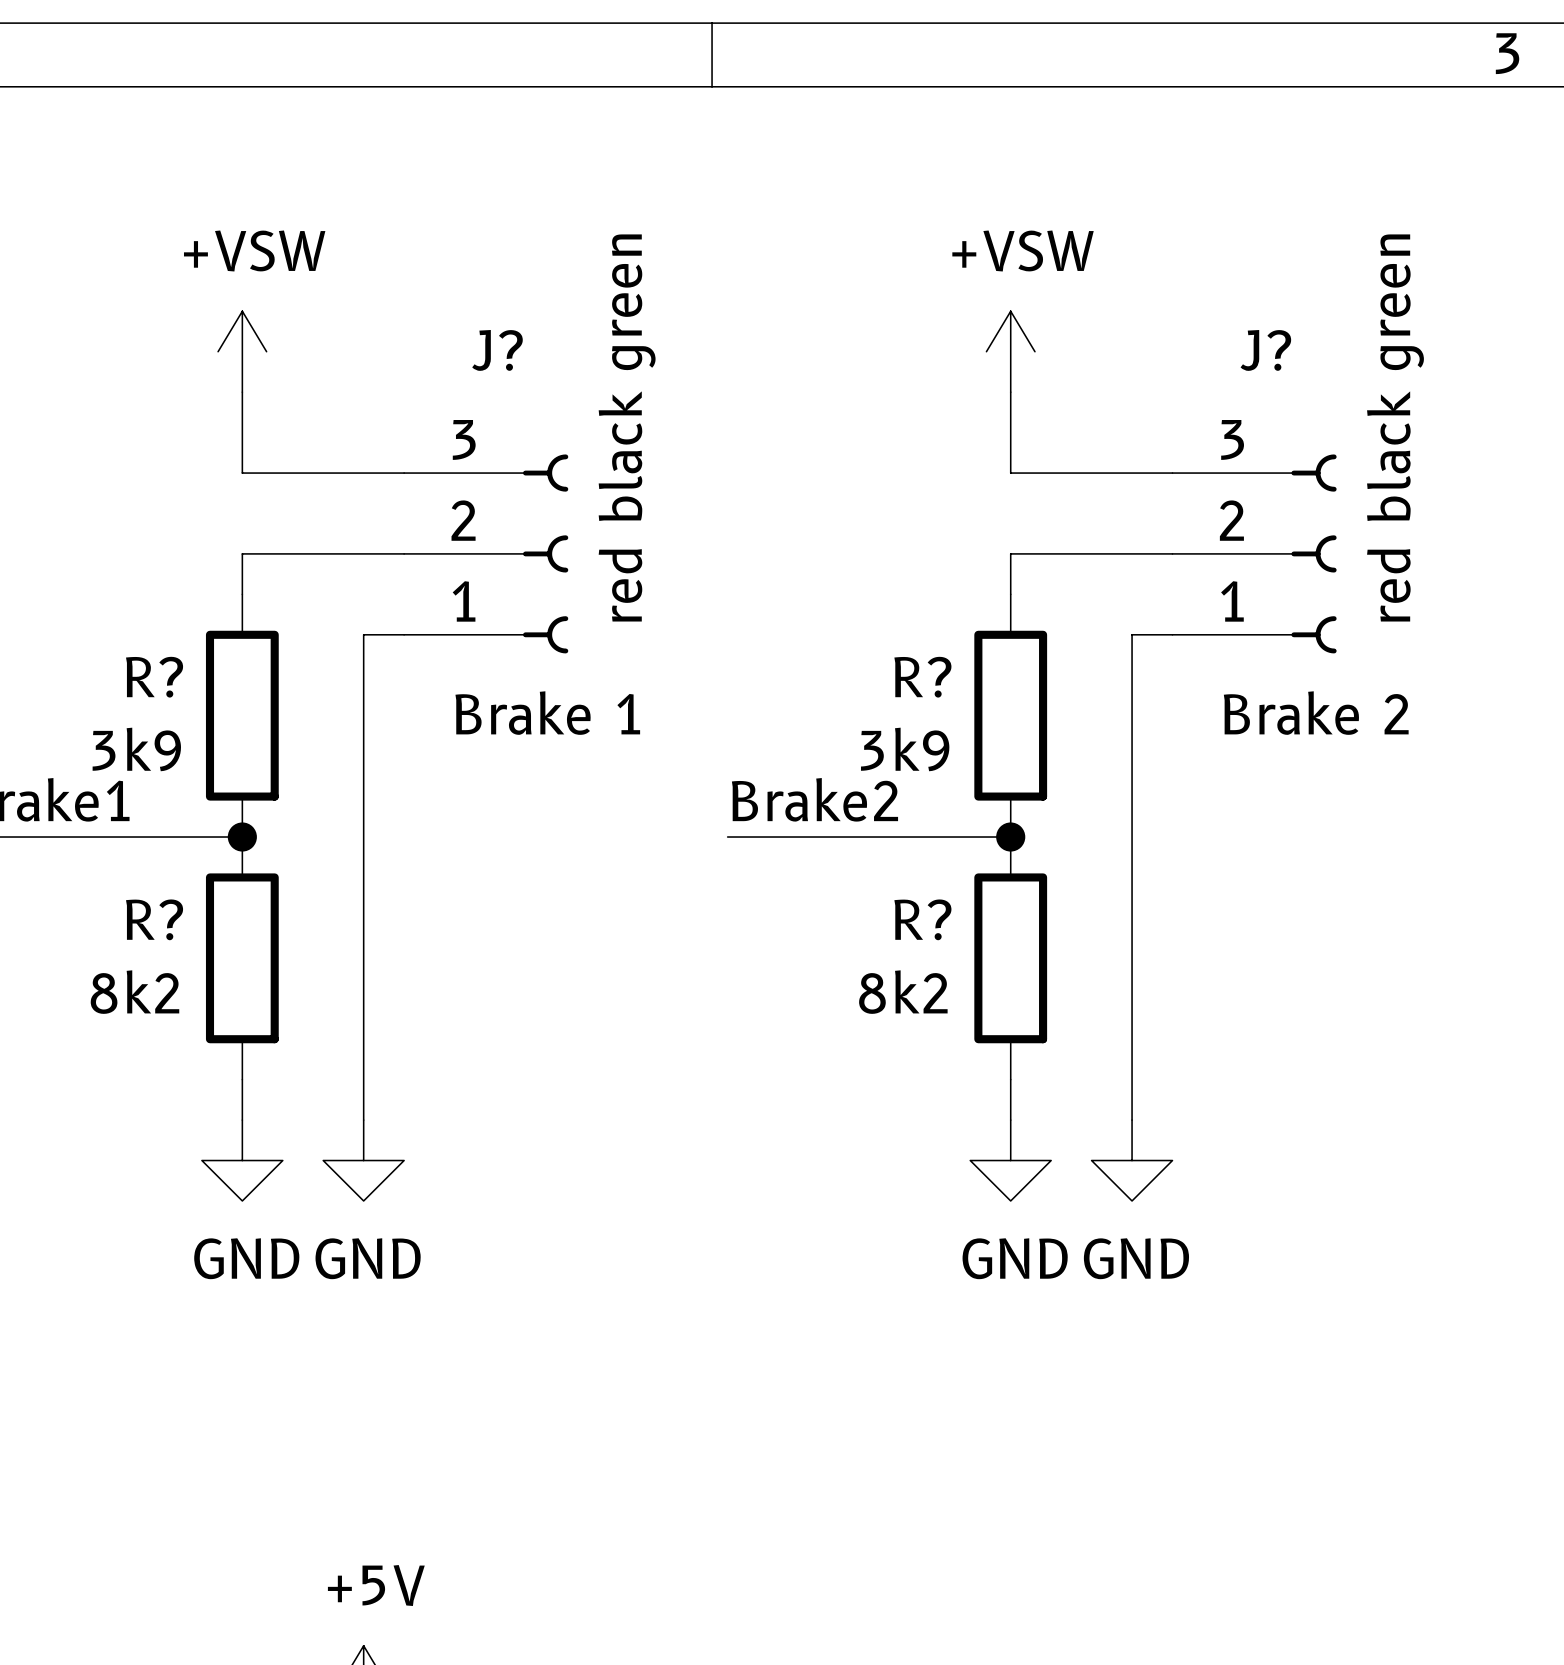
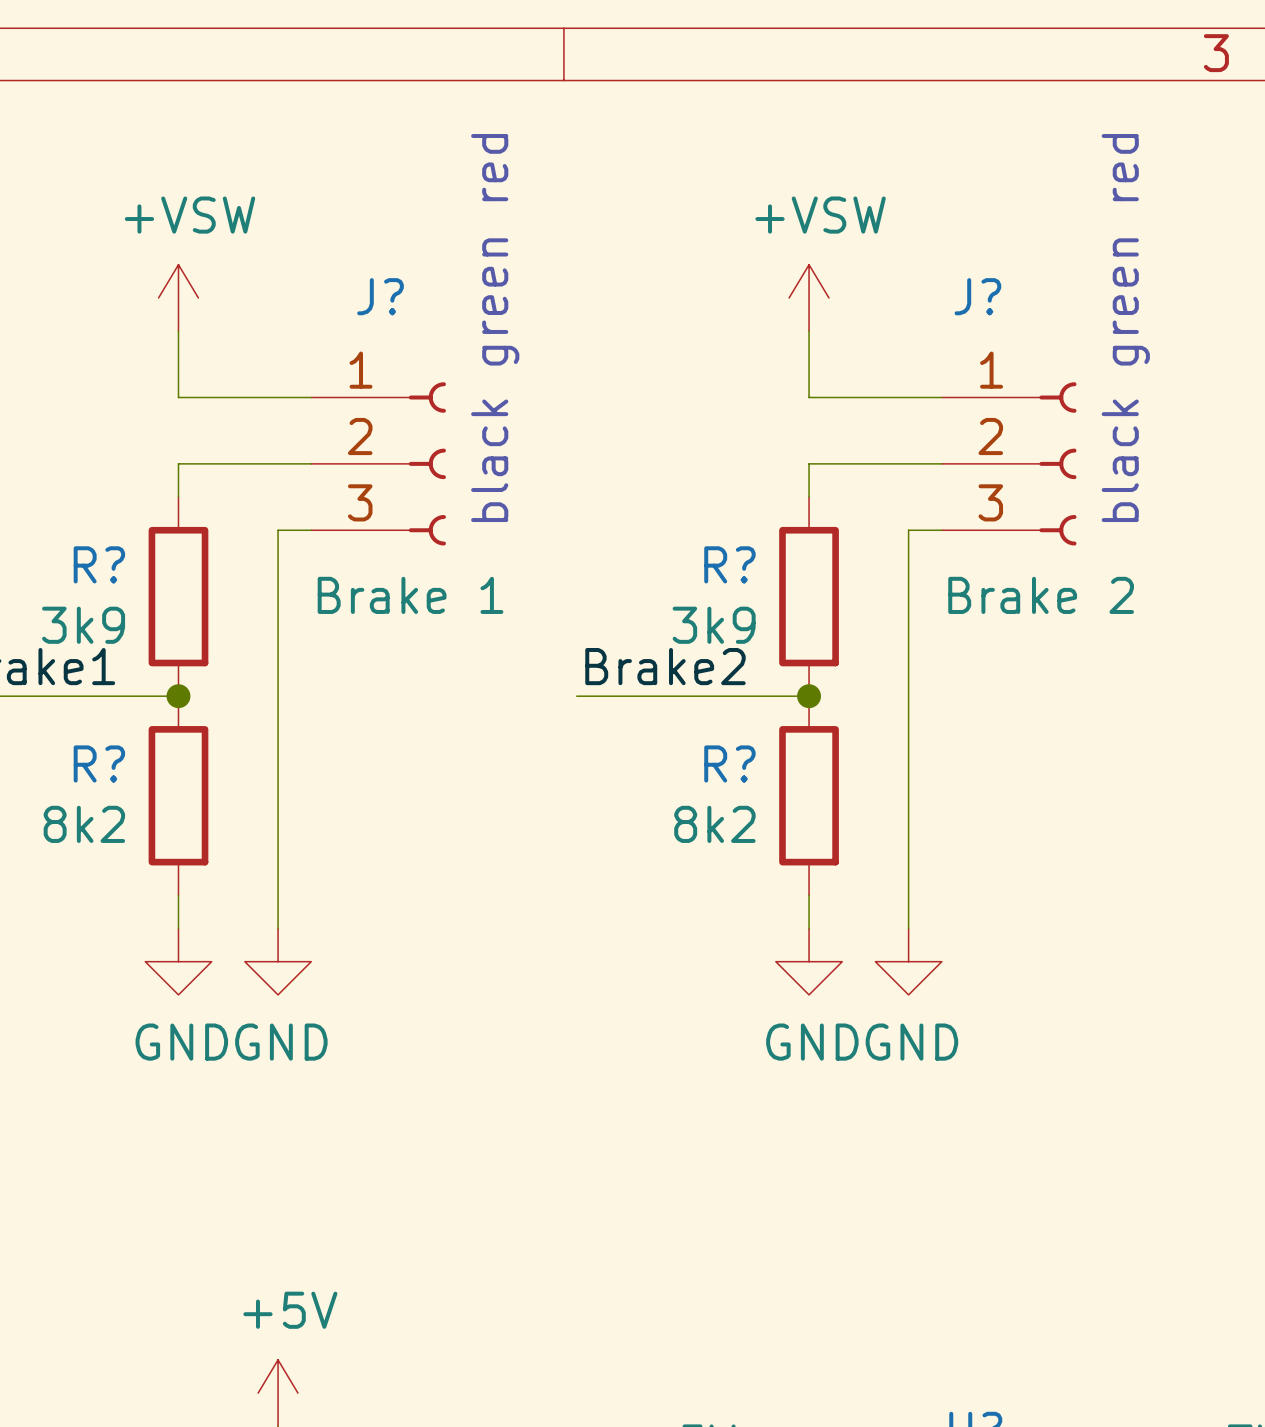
text: red black green (627, 427) -> black green red (495, 328)
text: red black green (1395, 427) -> black green red (1125, 328)
J? flip: as is (545, 553) -> up-down (427, 463)
J? flip: as is (1314, 553) -> up-down (1057, 463)

